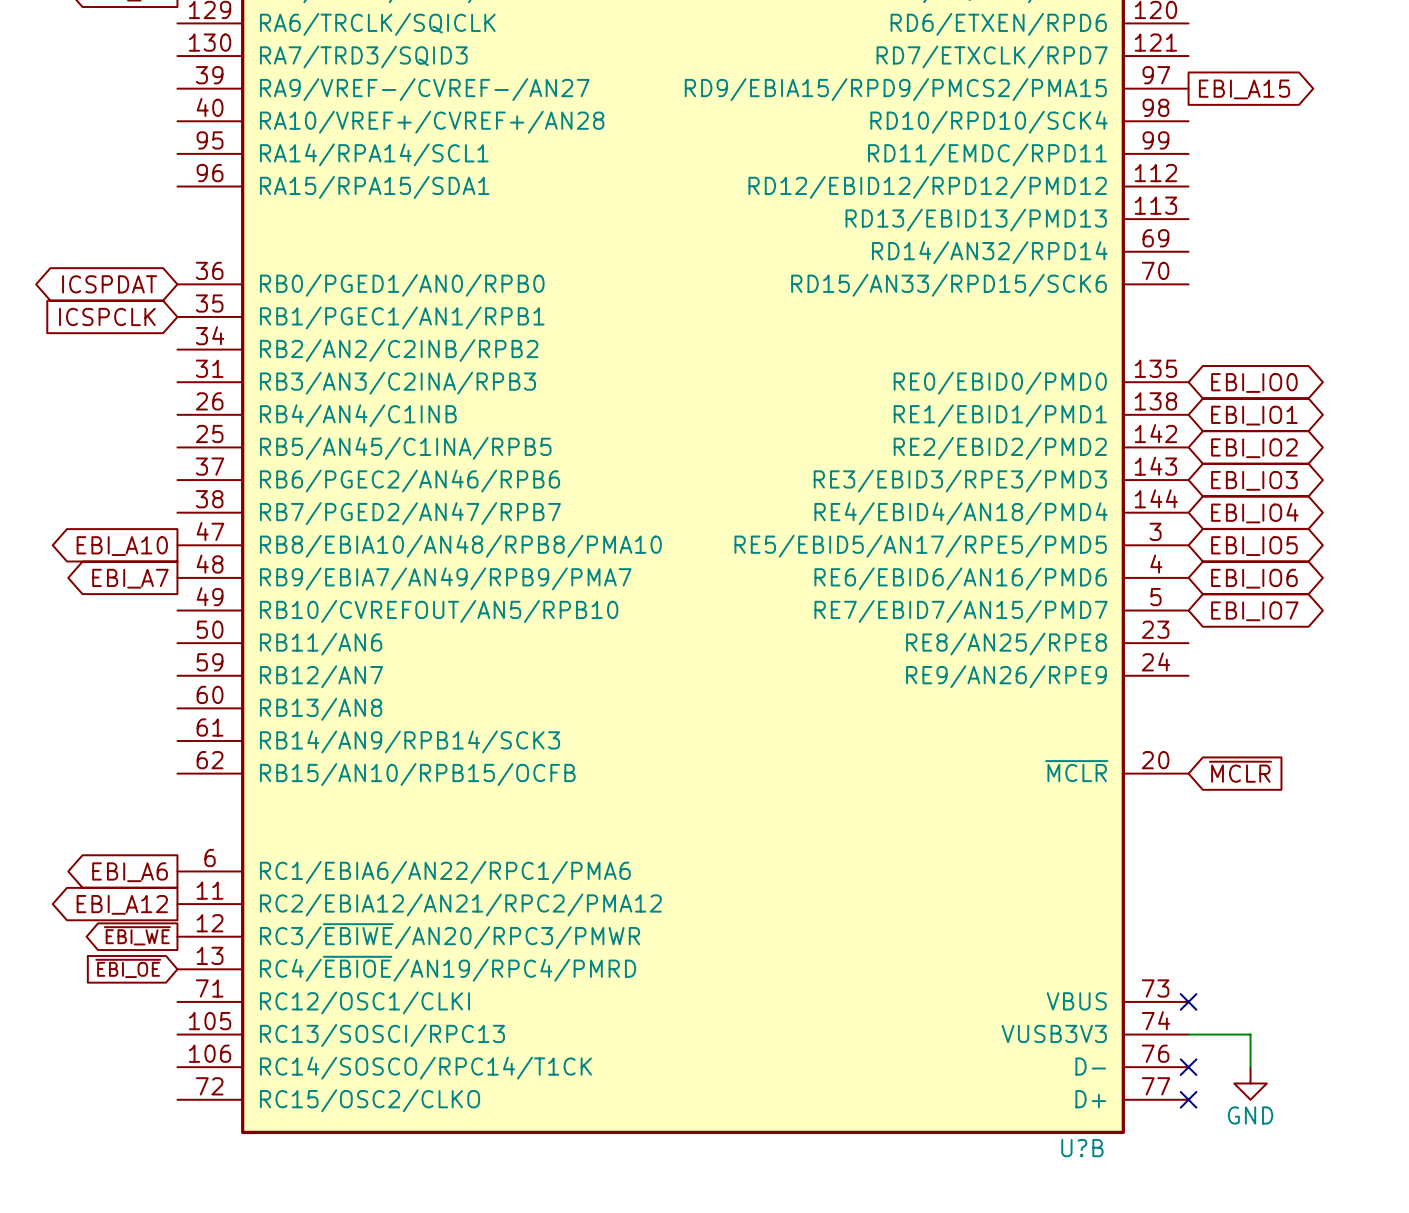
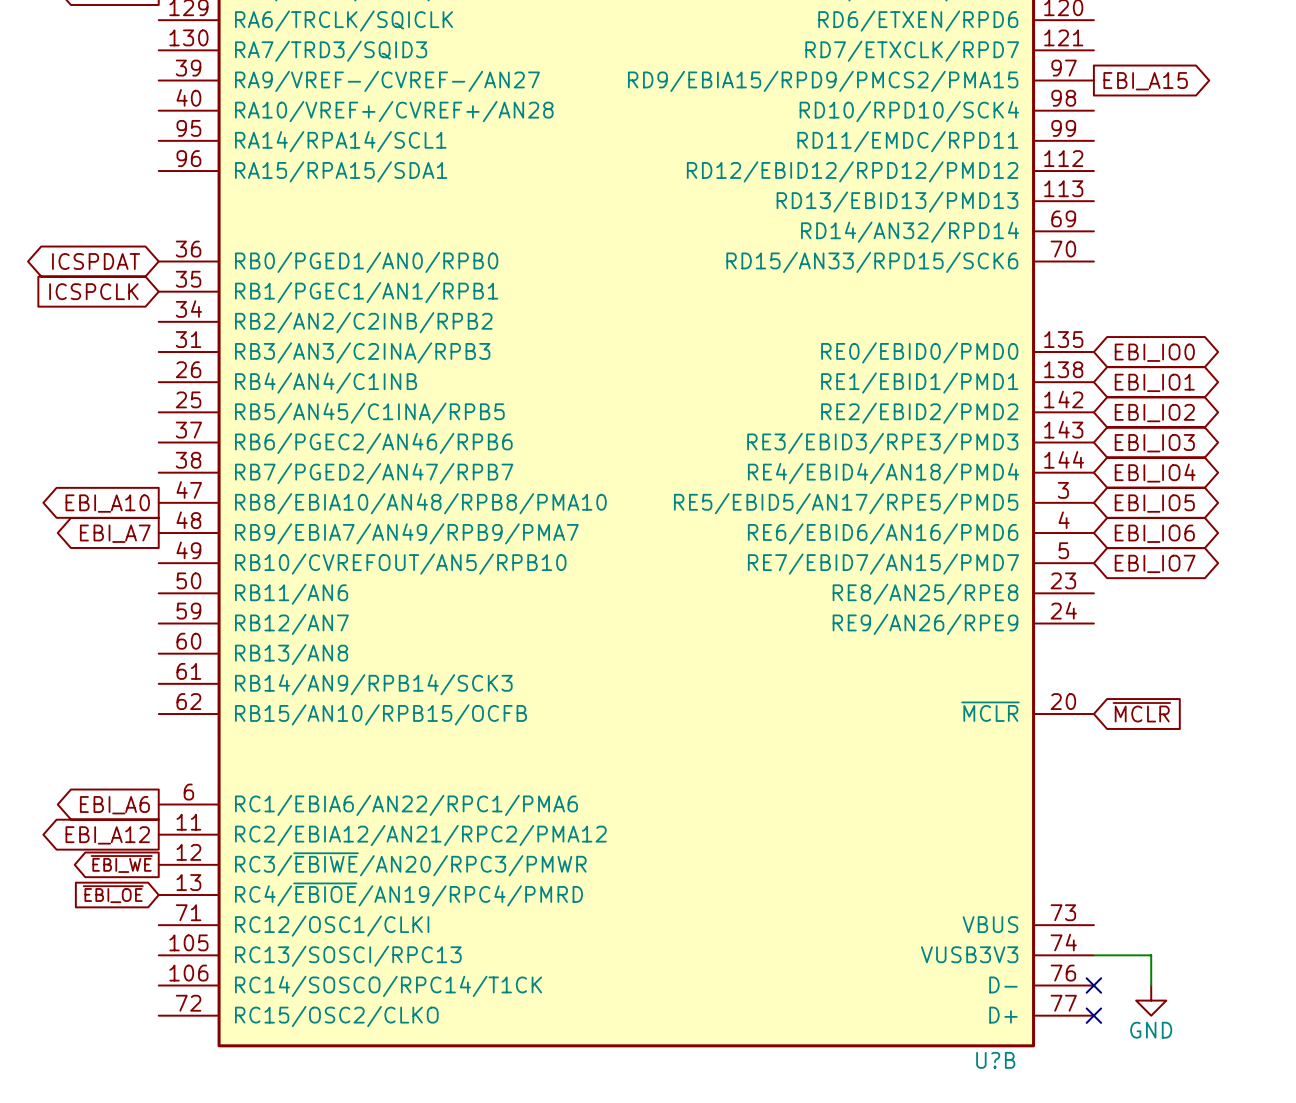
no-connect mark: (1188, 1001) -> none

